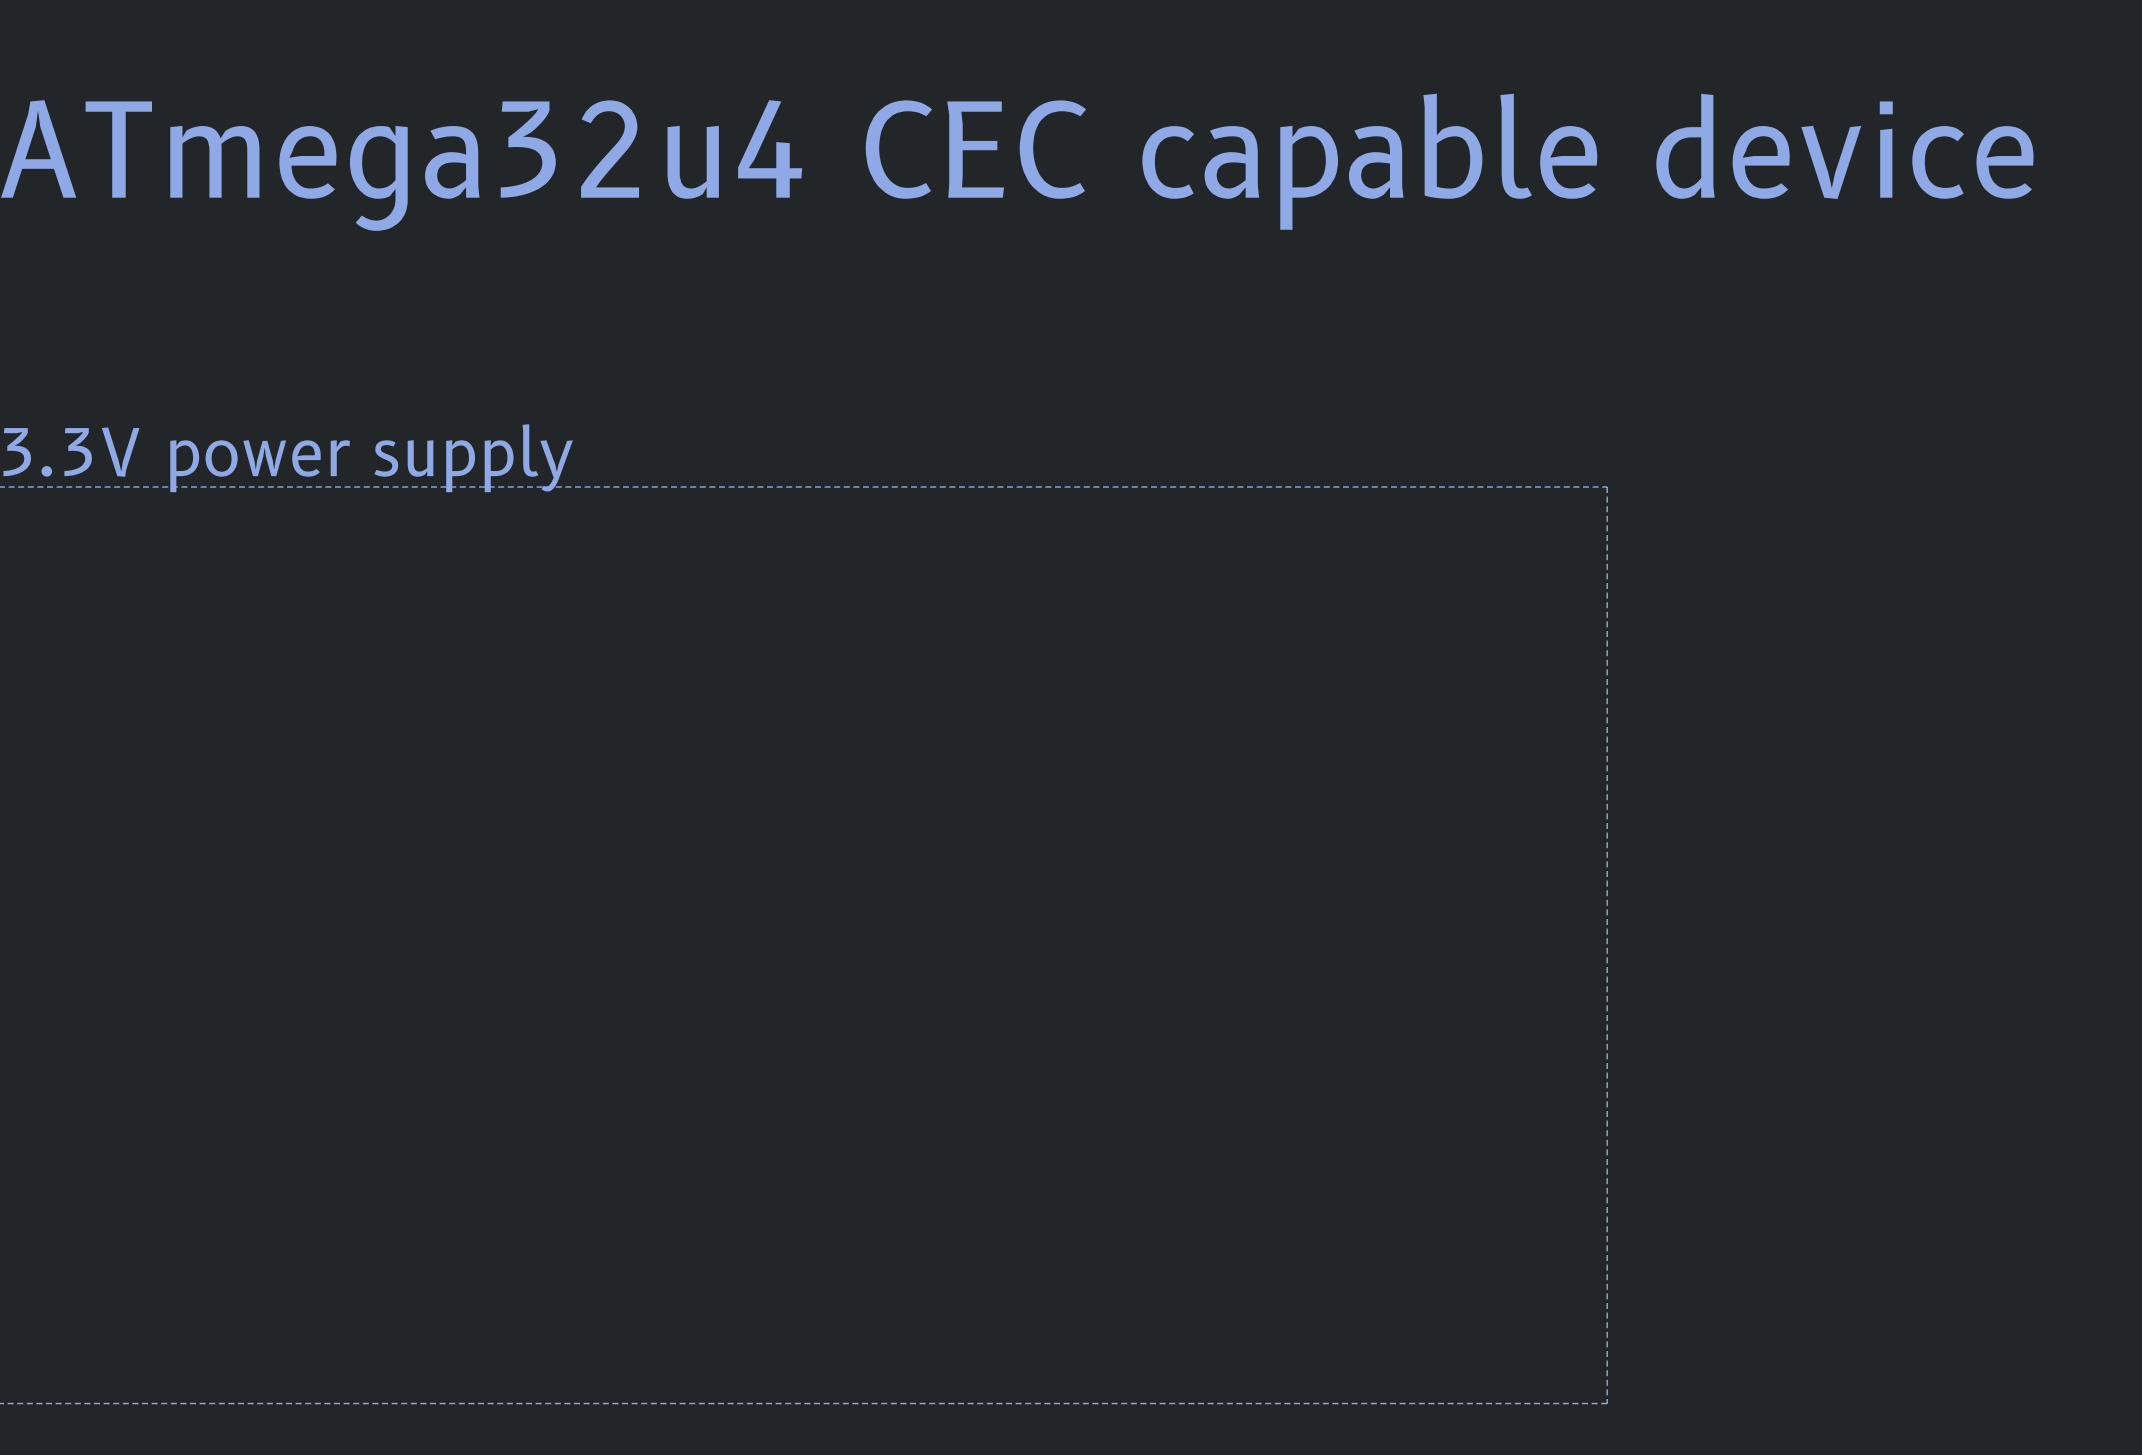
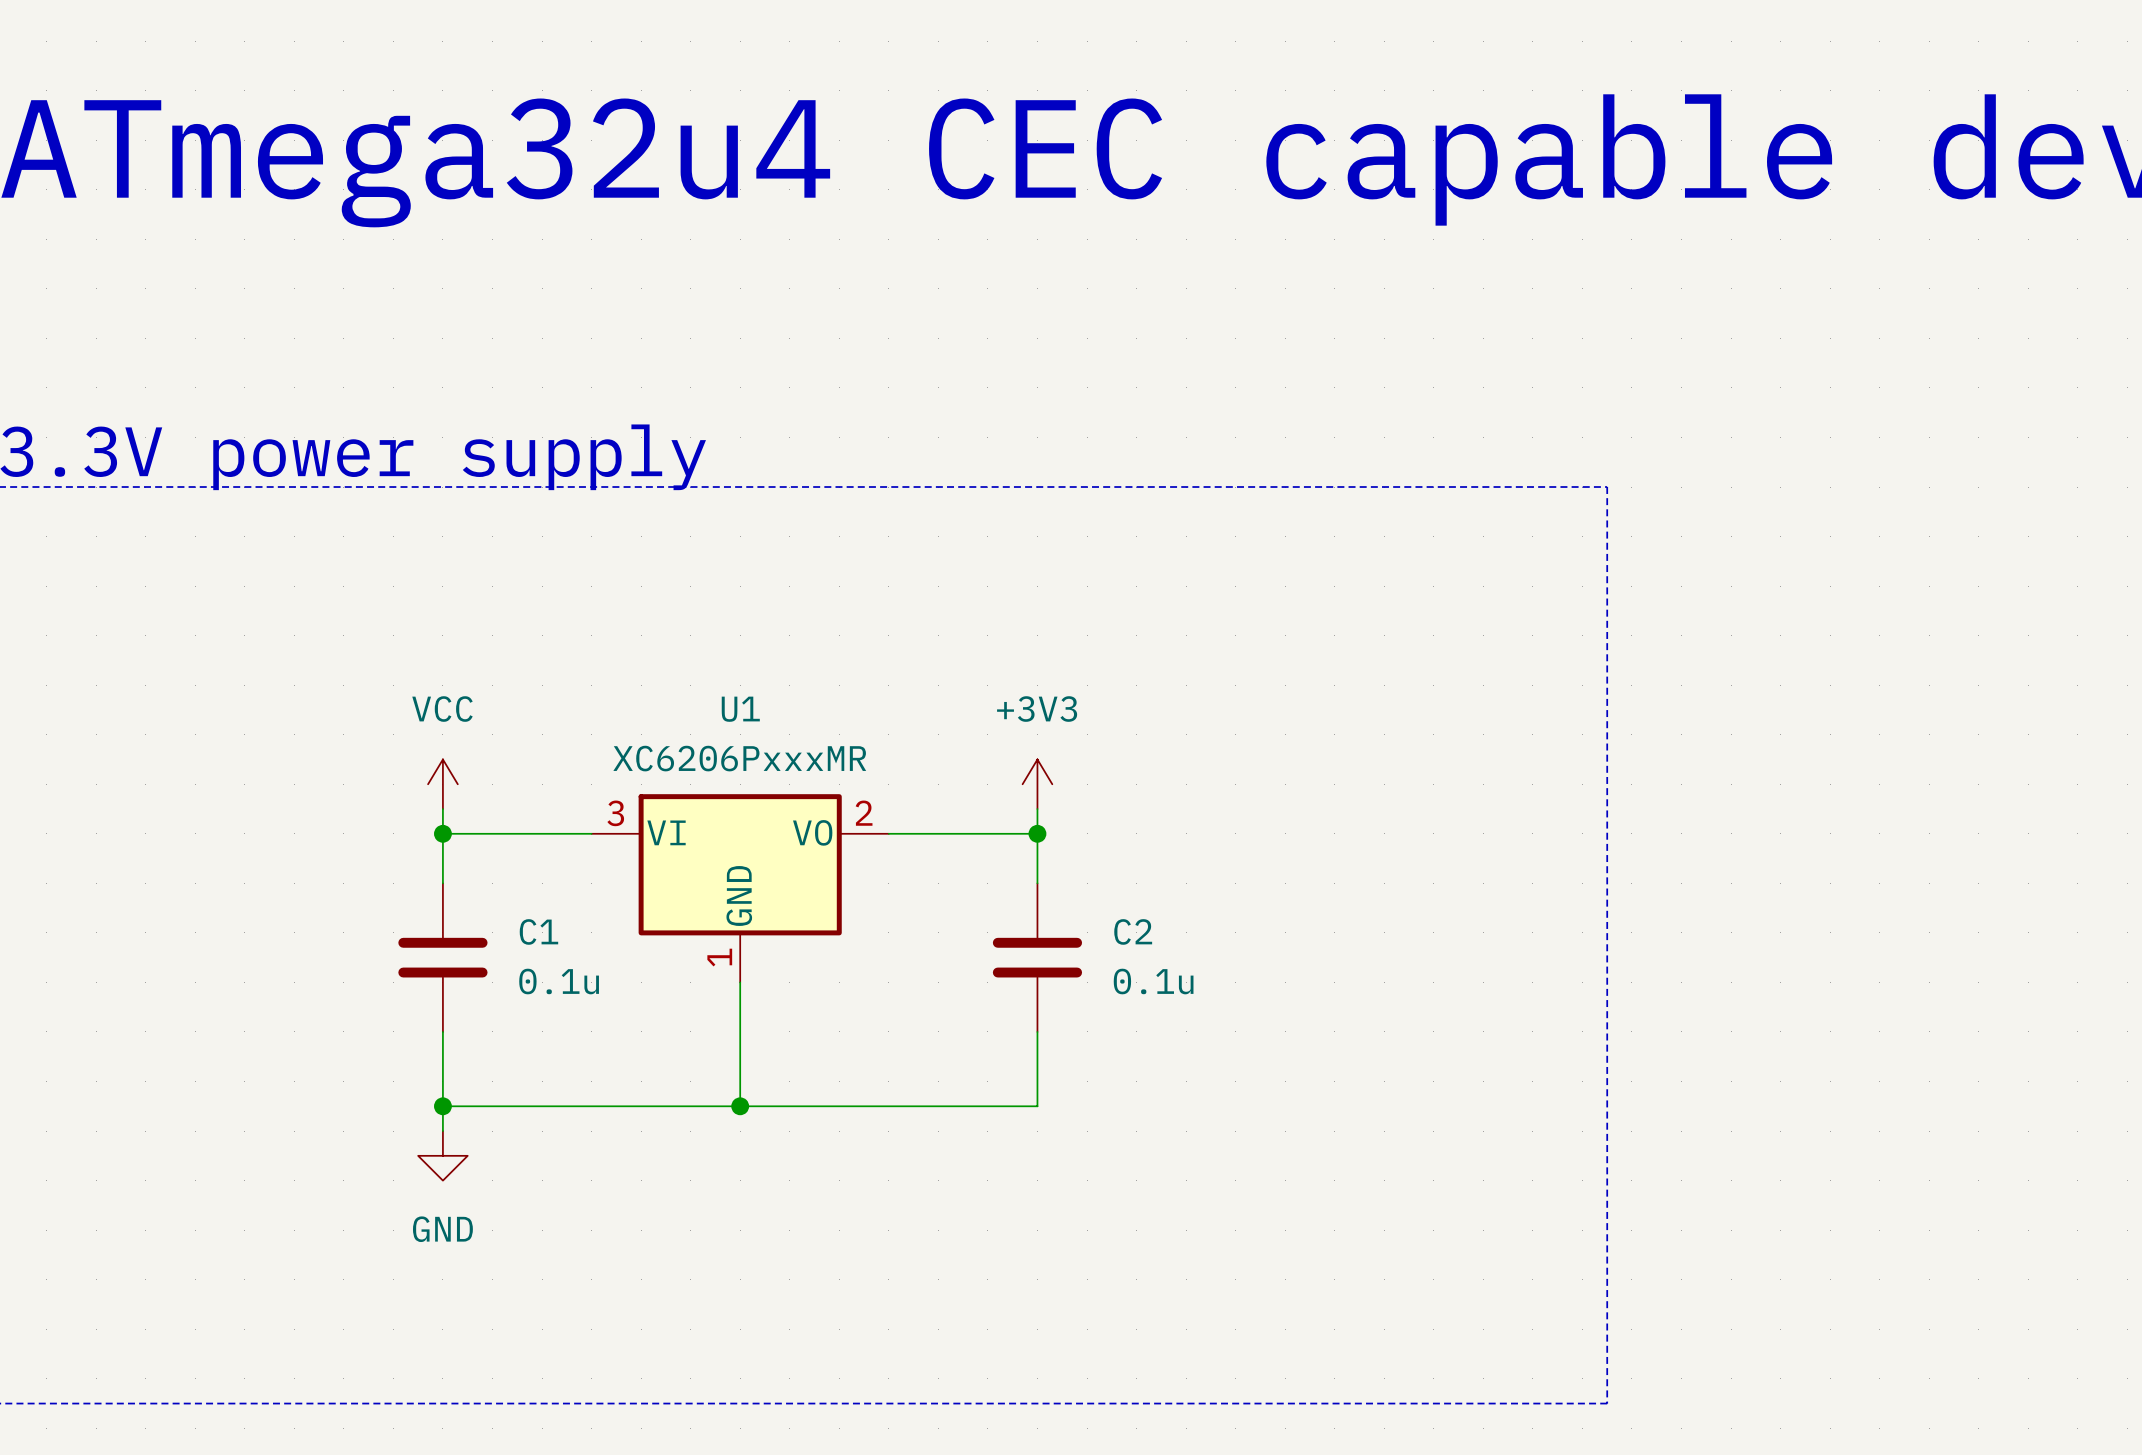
power symbol: none -> VCC (442, 784)
power symbol: none -> +3V3 (1037, 784)
wire: none -> (442, 809) (442, 883)
wire: none -> (1037, 809) (1037, 883)
wire: none -> (442, 833) (591, 833)
junction: none -> (442, 833)
wire: none -> (888, 833) (1037, 833)
junction: none -> (1037, 833)
U1: none -> XC6206PxxxMR (740, 888)
C1: none -> 0.1u (442, 957)
C2: none -> 0.1u (1037, 957)
wire: none -> (740, 982) (740, 1106)
wire: none -> (442, 1031) (442, 1131)
wire: none -> (1037, 1031) (1037, 1106) (442, 1106)
junction: none -> (442, 1106)
junction: none -> (740, 1106)
power symbol: none -> GND (442, 1155)

